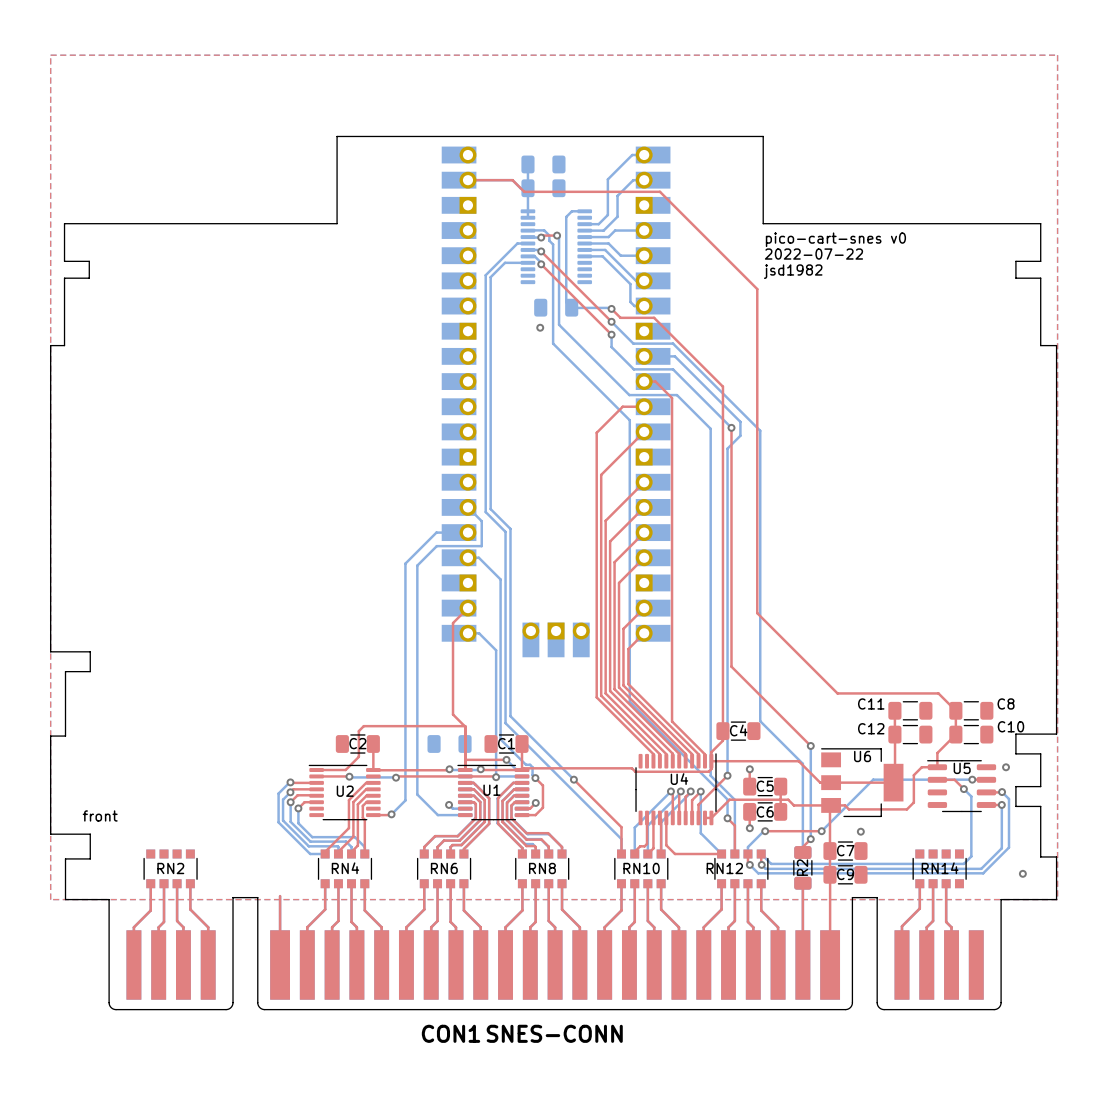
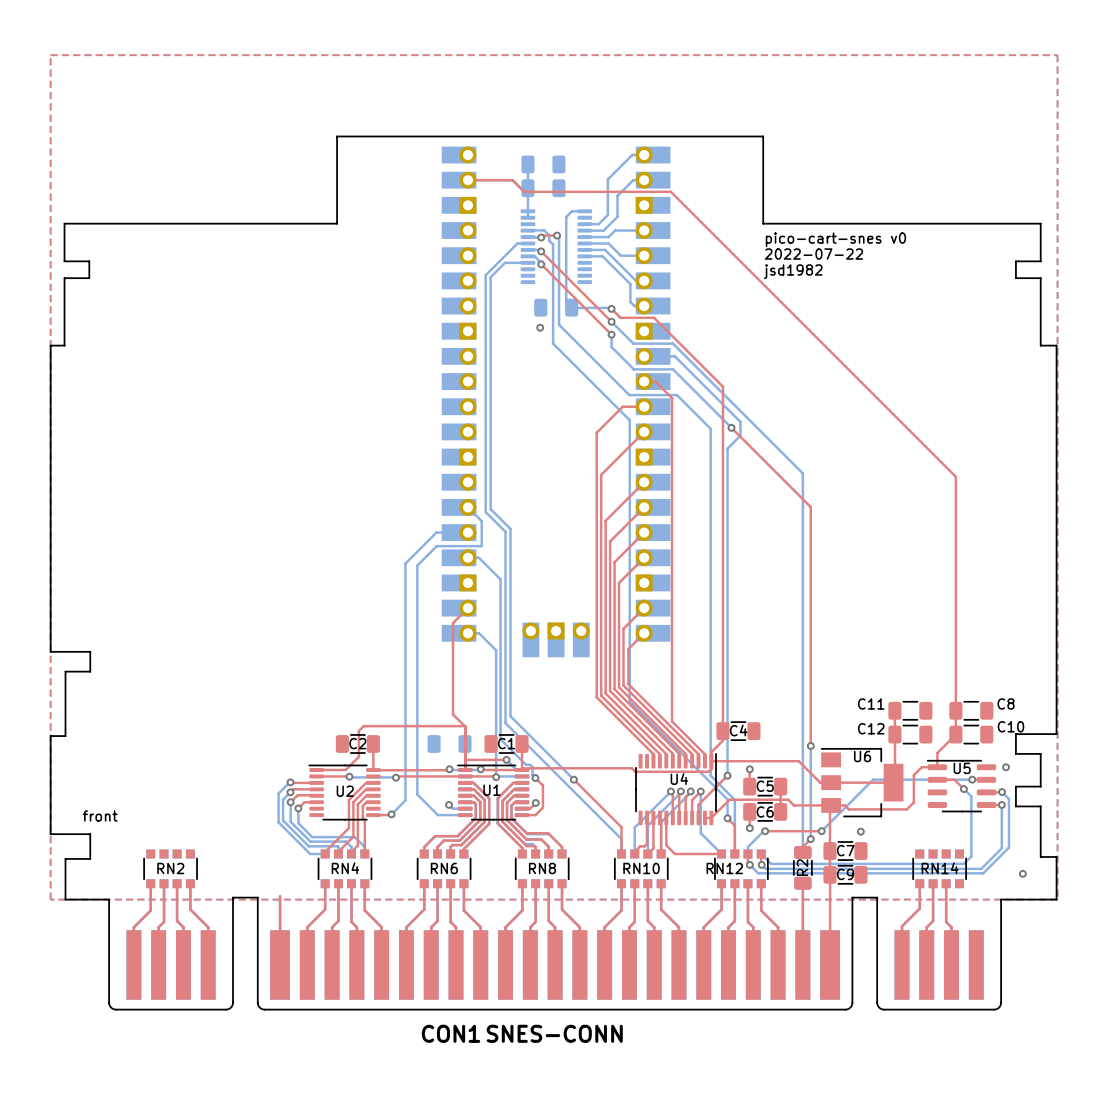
top track: (660, 191) (757, 289) (757, 613) (837, 693) (938, 693) (955, 710) -> (660, 191) (670, 191) (955, 476) (955, 710)
top track: (731, 427) (731, 666) (810, 745) -> (731, 427) (810, 507) (810, 745)
bottom track: (760, 430) (760, 721) (802, 763) -> (760, 430) (802, 473) (802, 763)

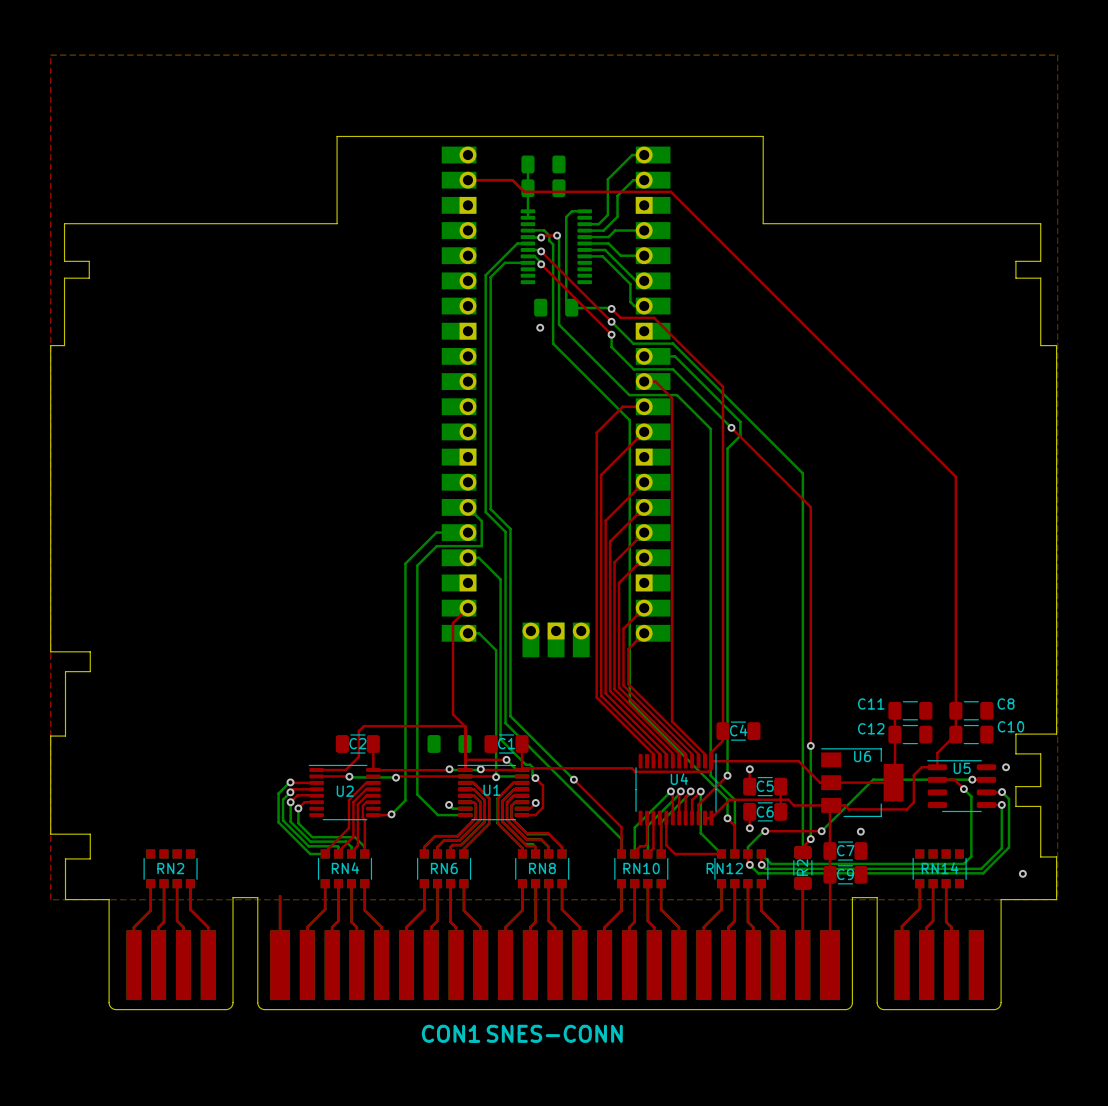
text: pico-cart-snes v0 (835, 239) -> none
text: 2022-07-22 (813, 254) -> none
text: jsd1982 (793, 271) -> none
text: front (100, 815) -> none

